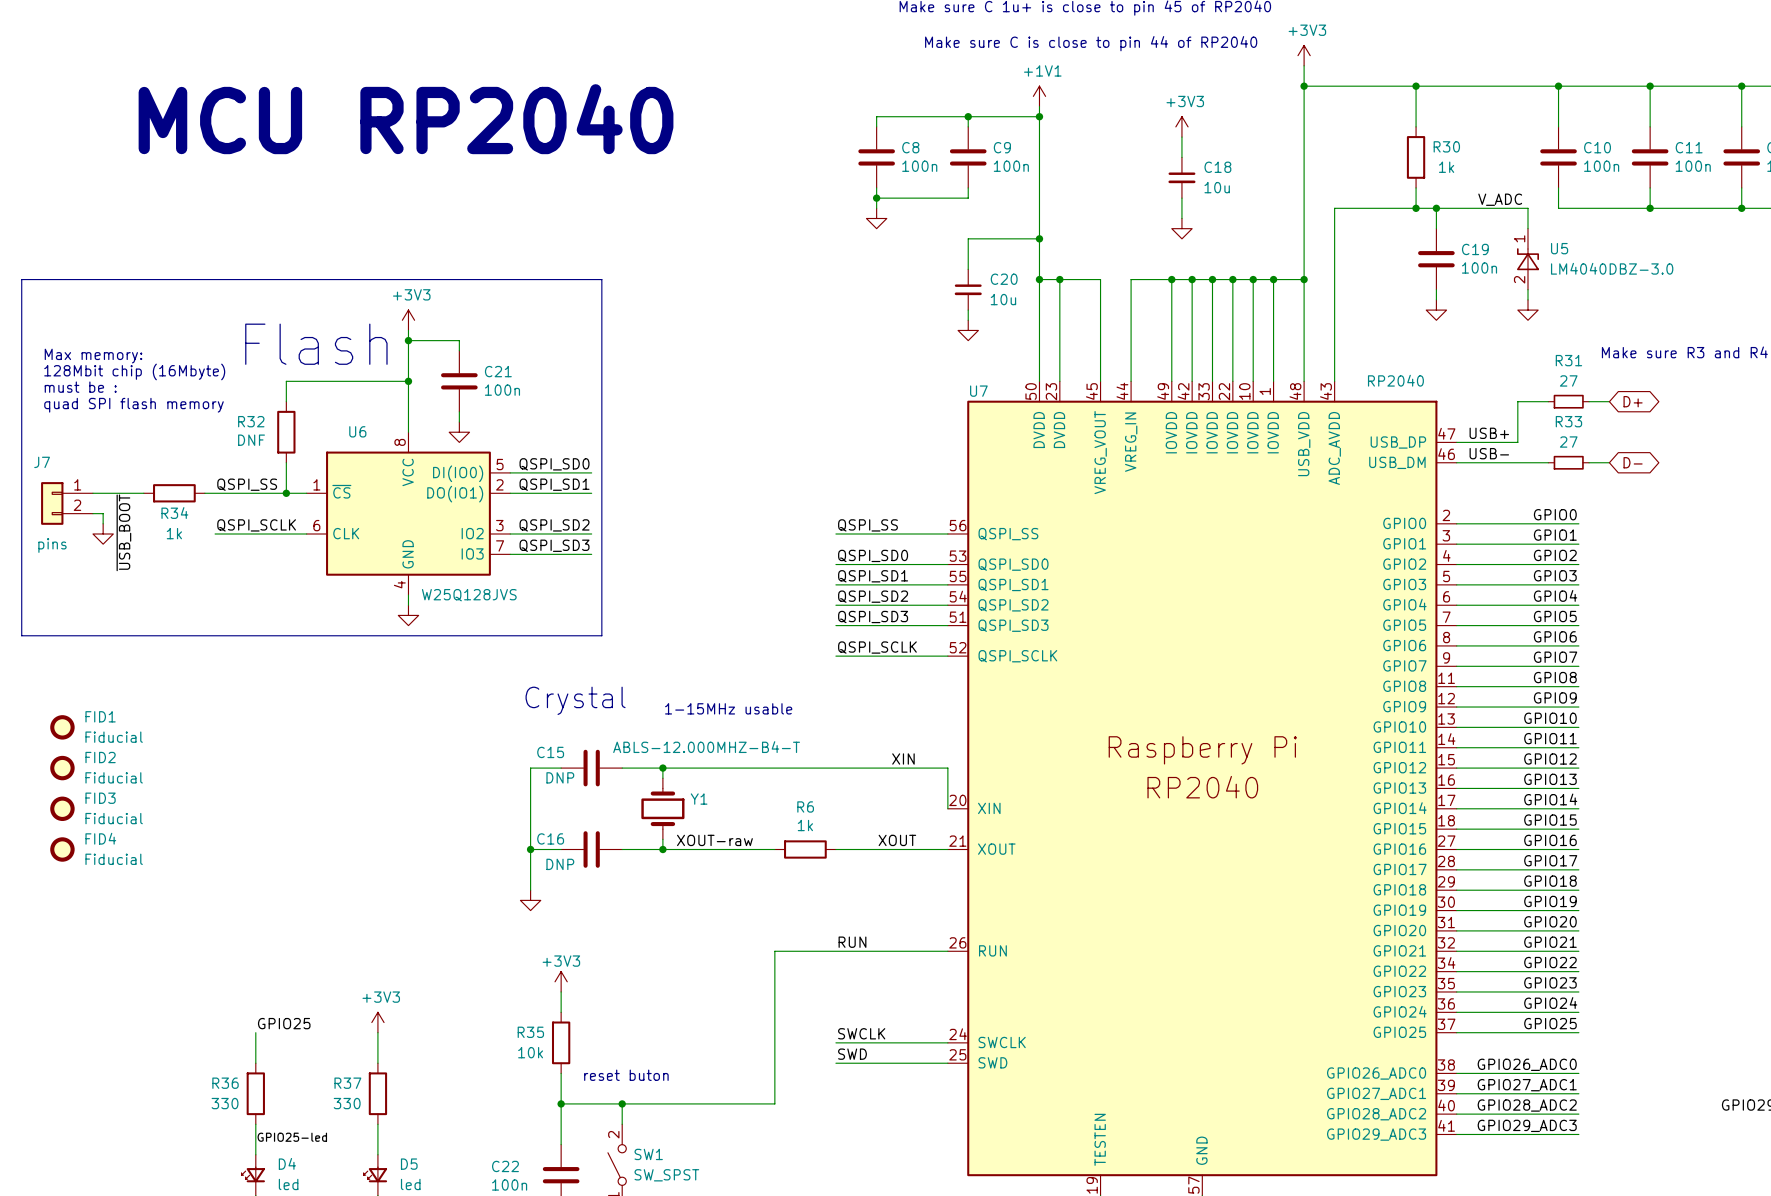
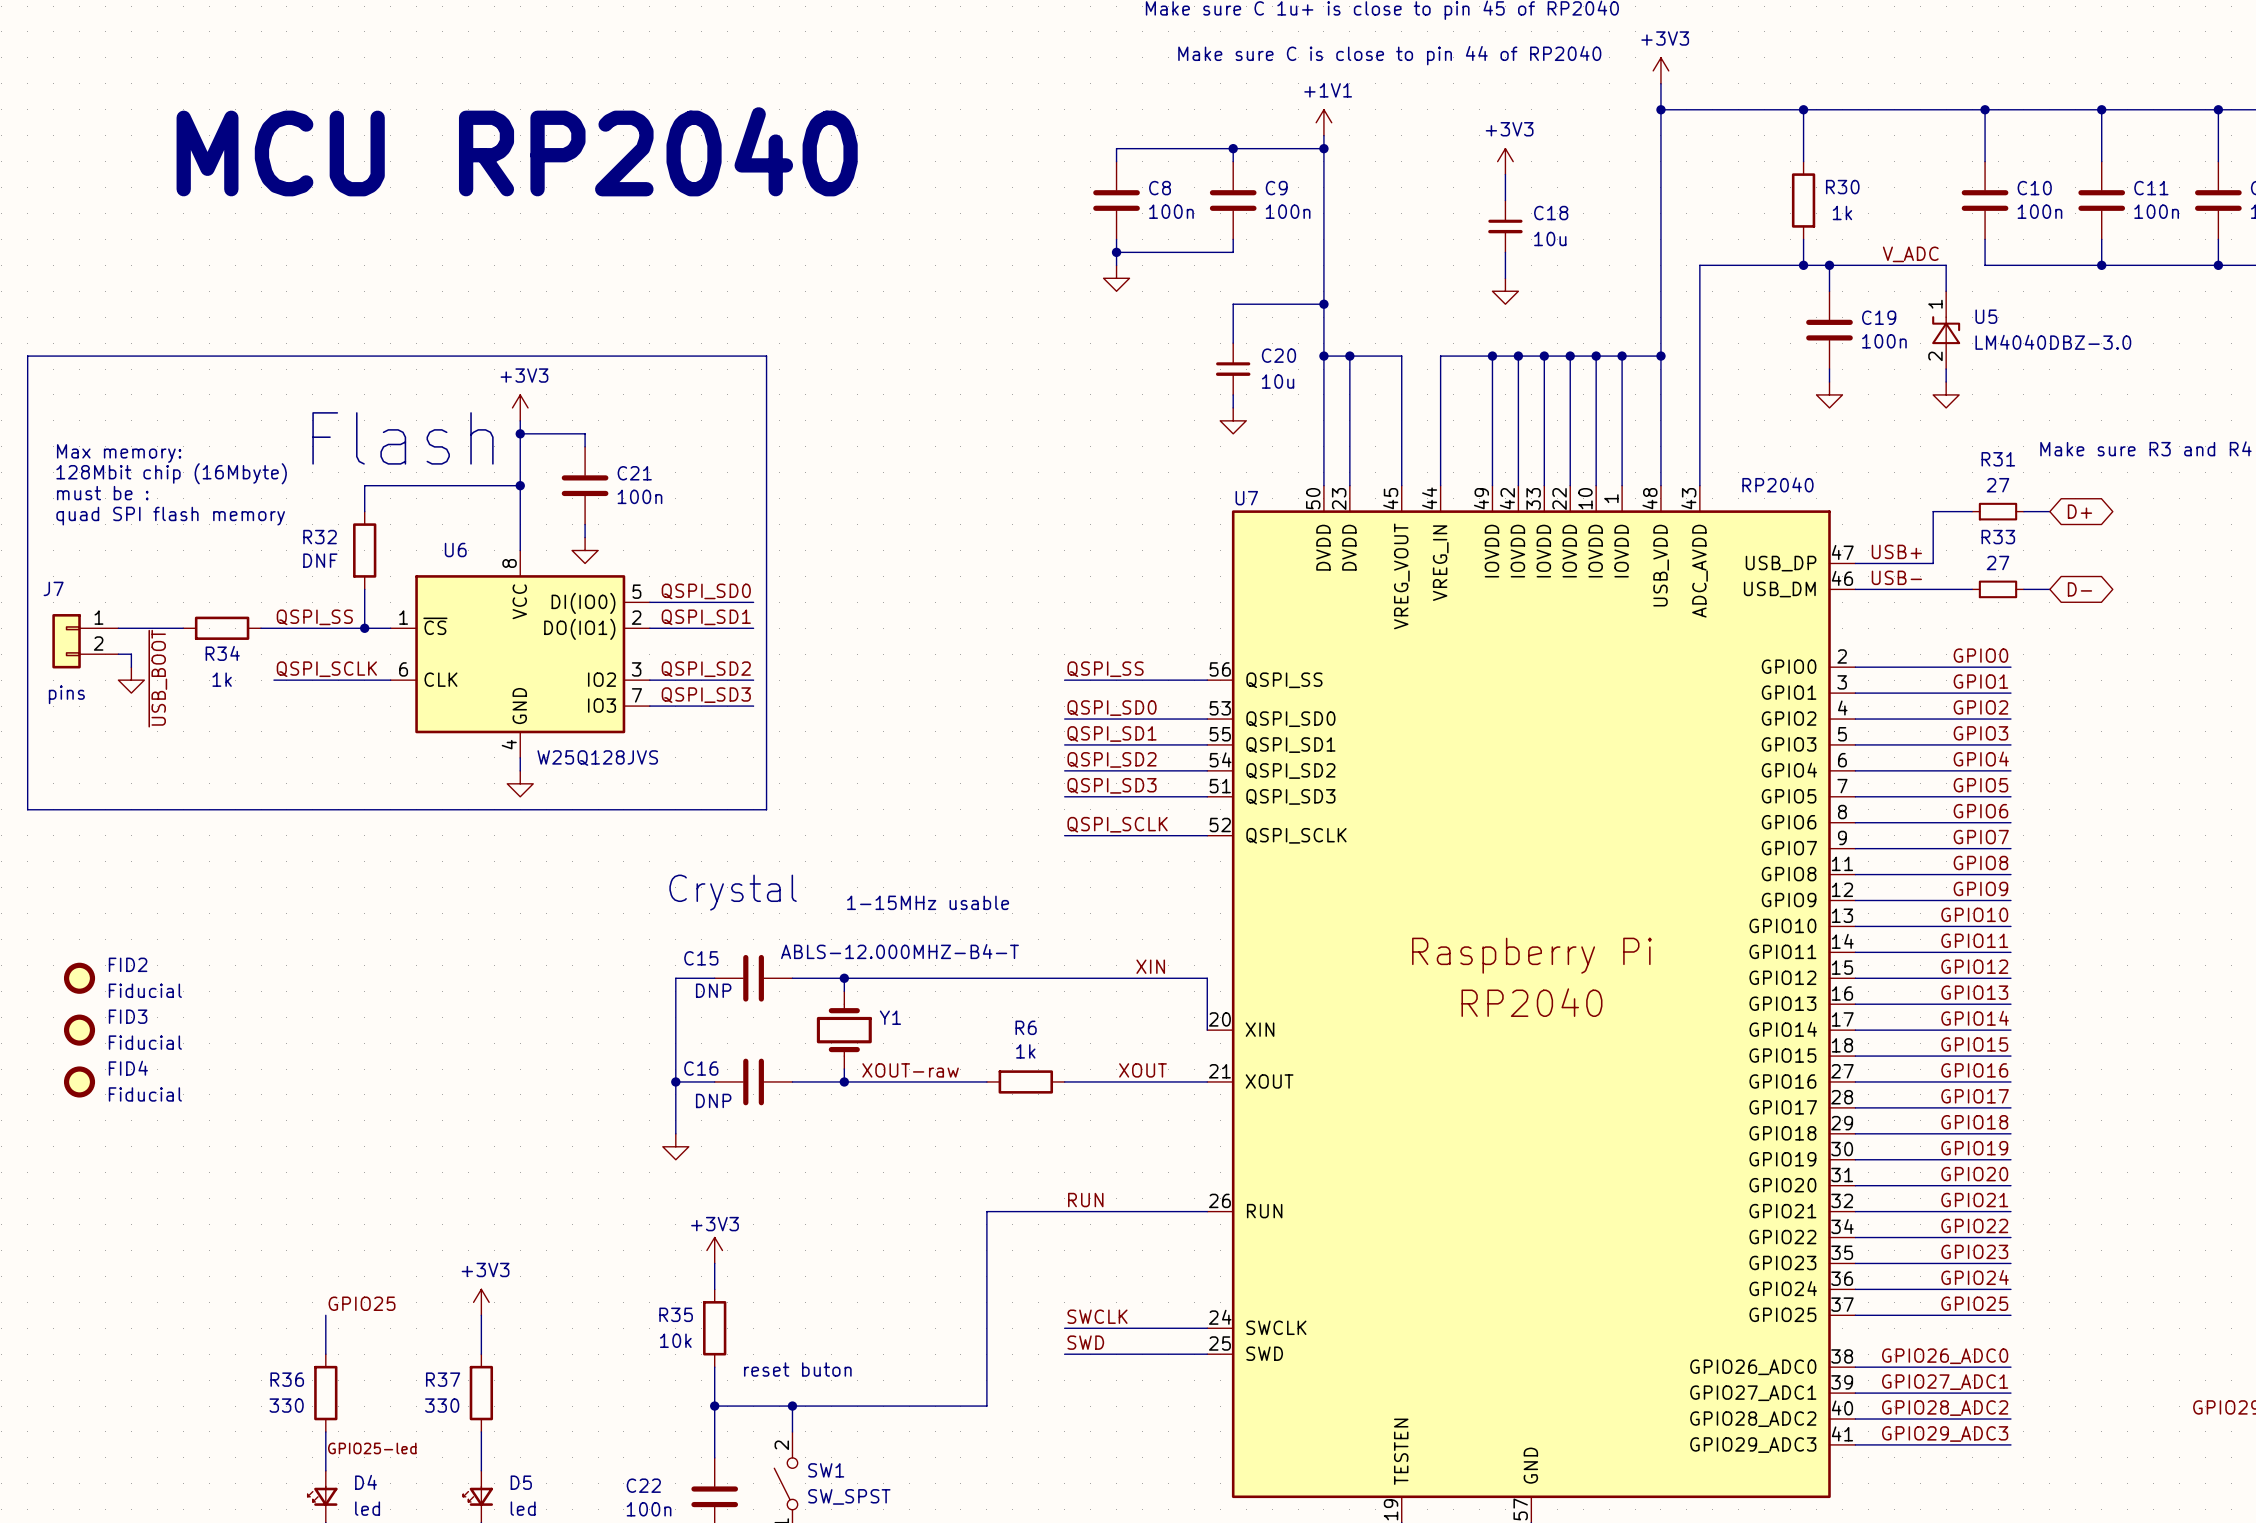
FID1: Fiducial (62, 727) -> none

